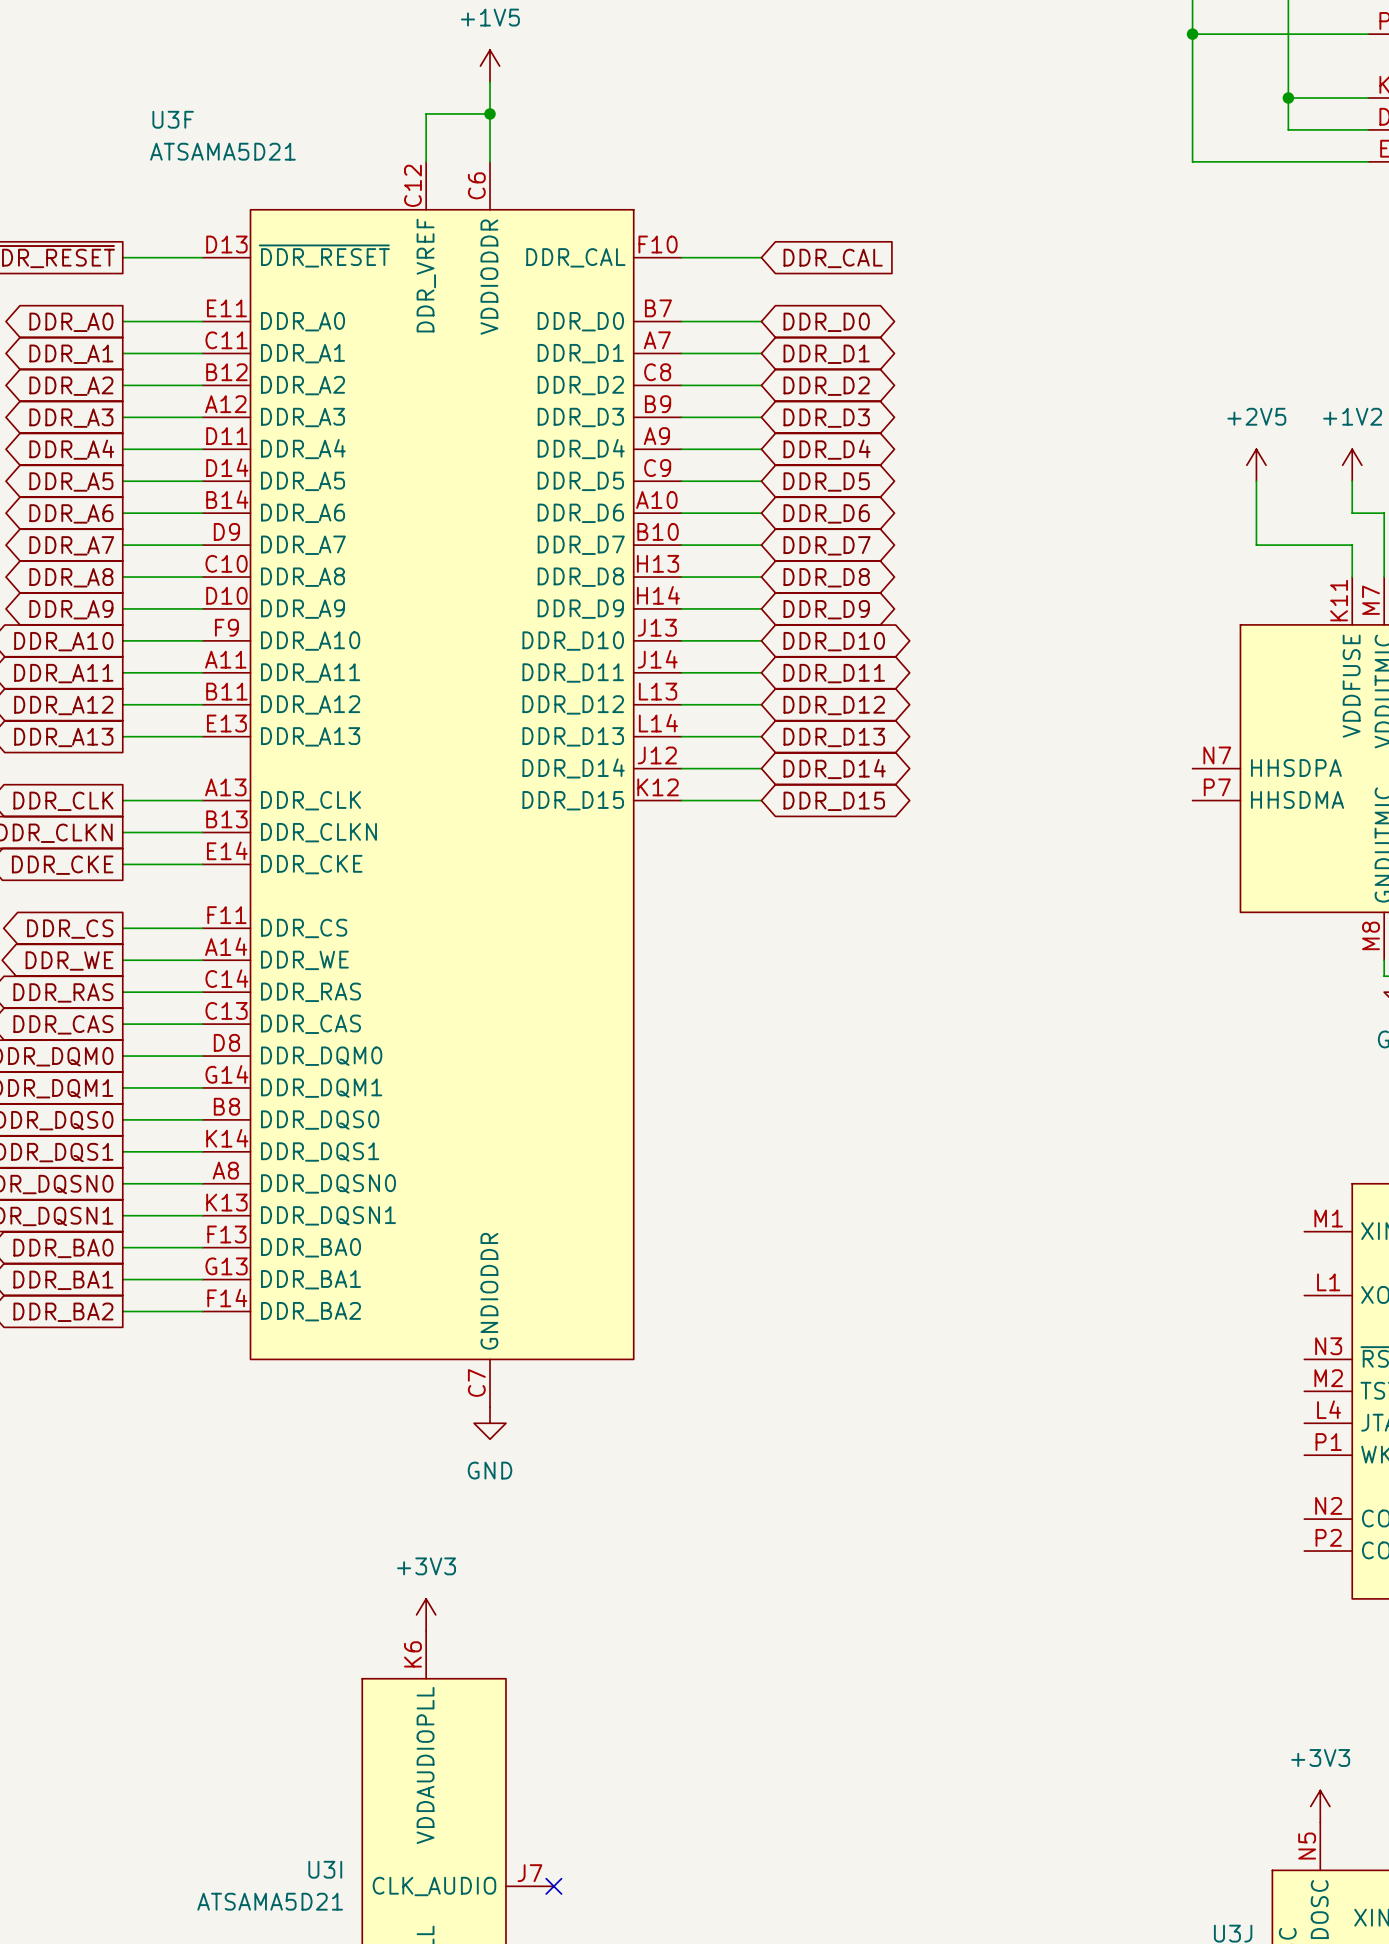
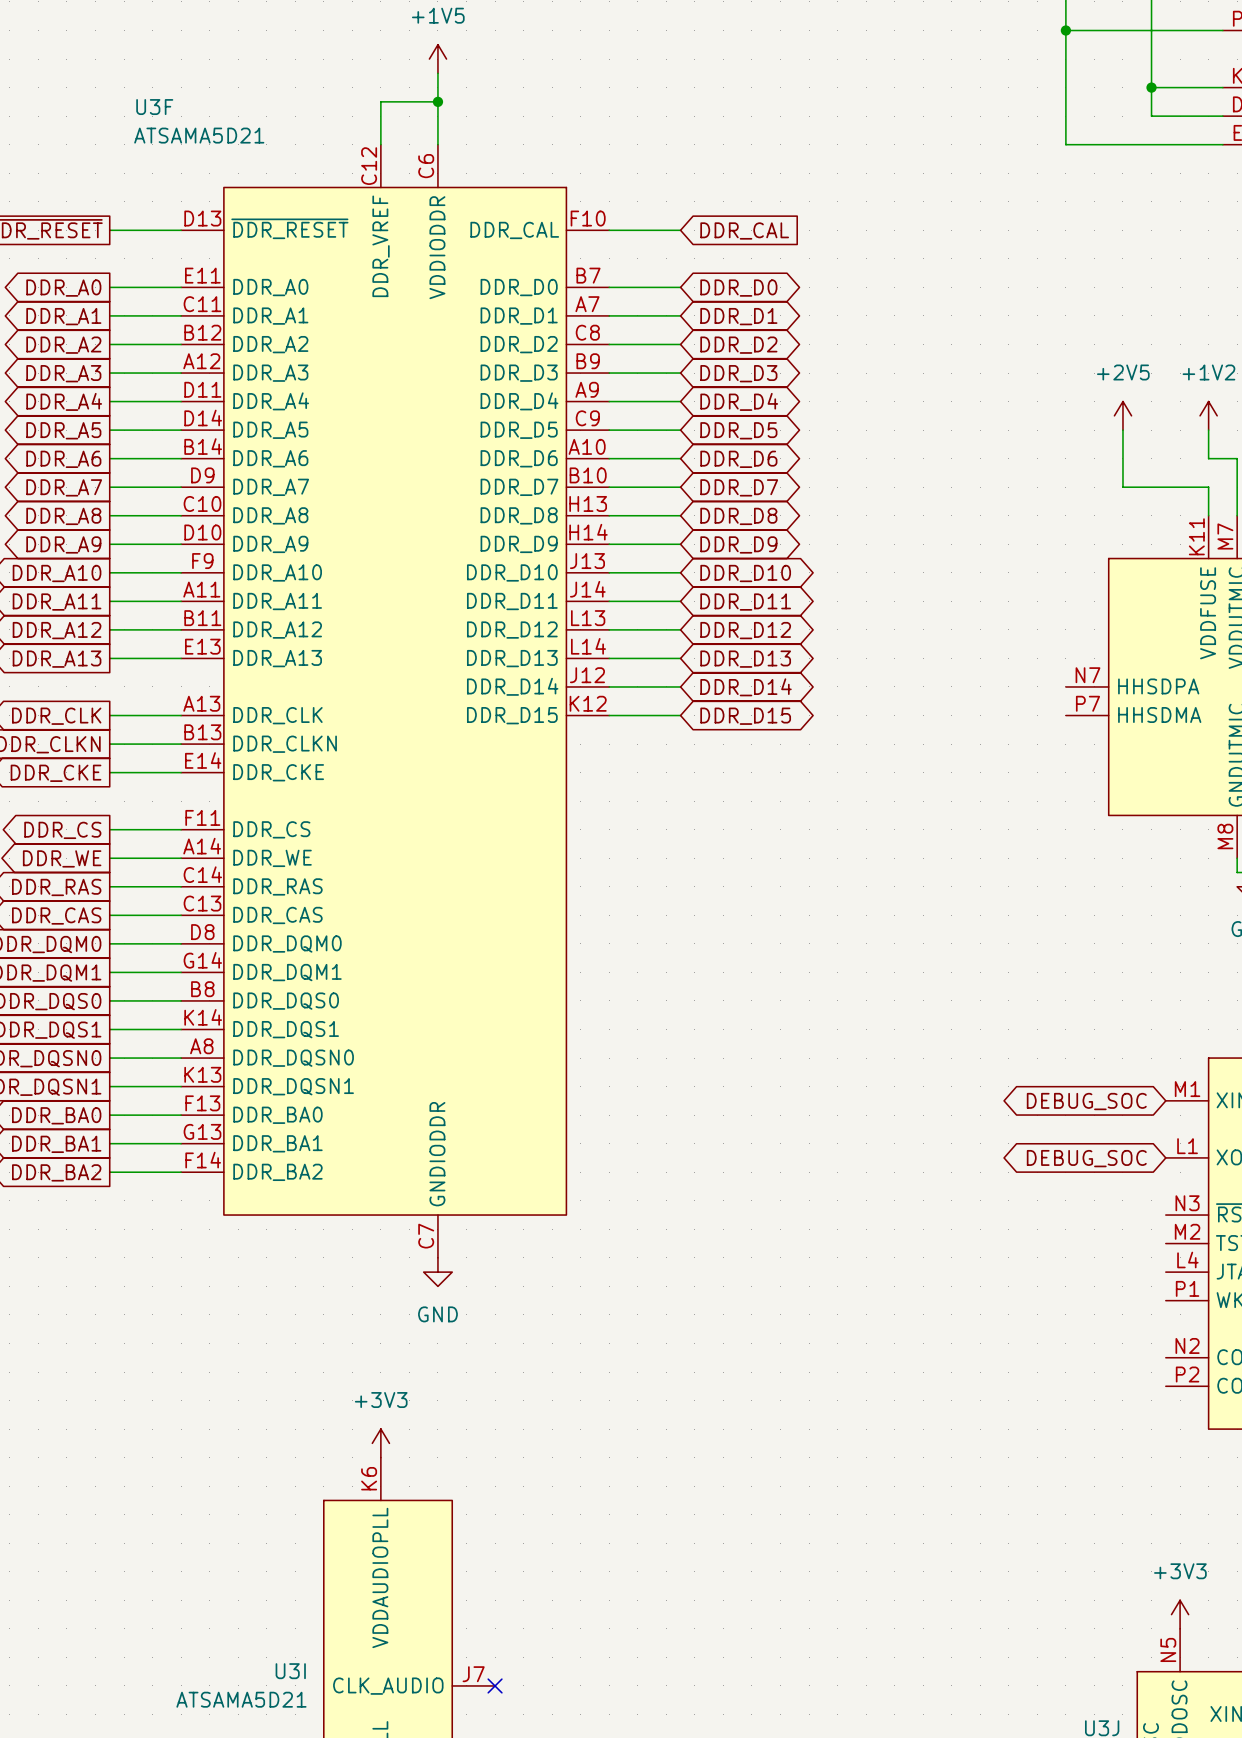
global label: none -> DEBUG_SOC (1086, 1101)
global label: none -> DEBUG_SOC (1086, 1158)

